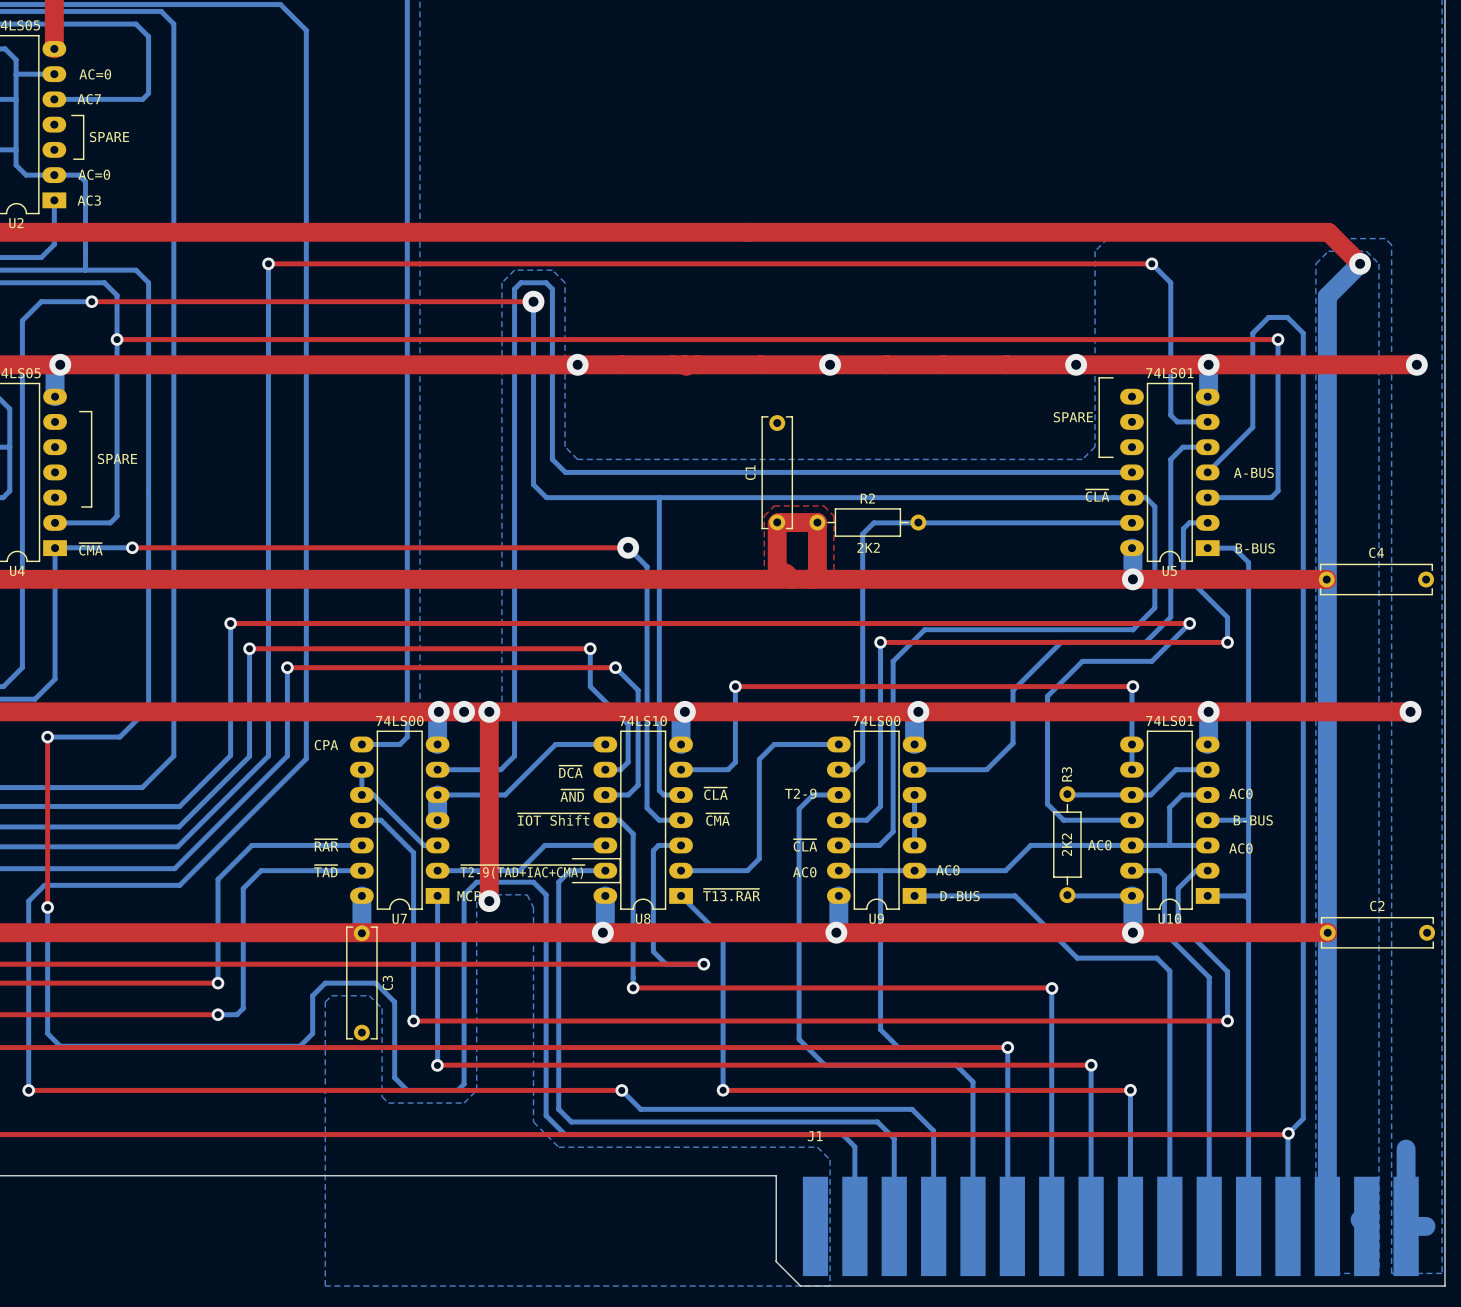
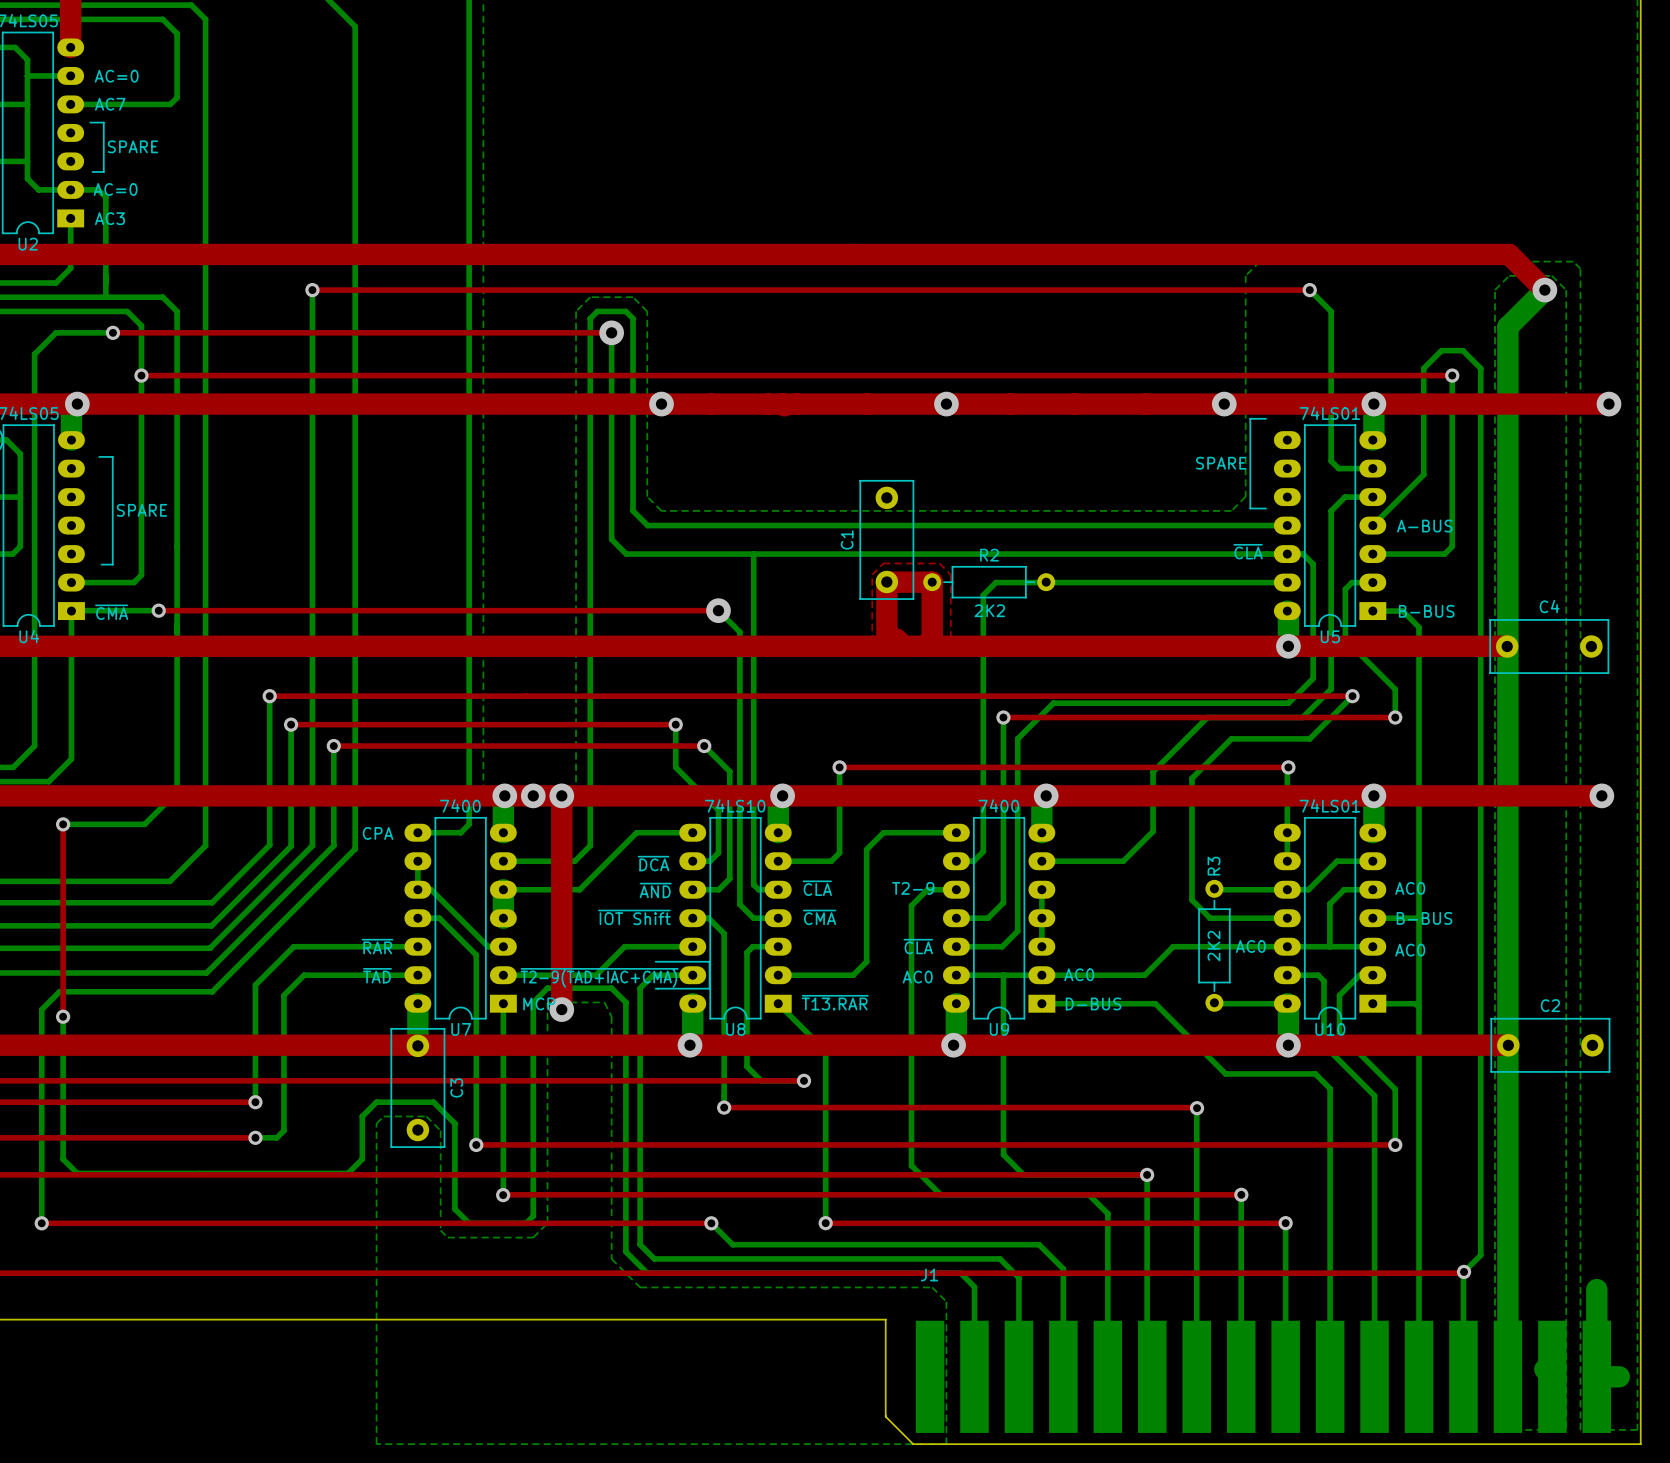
C1 footprint: [761, 415, 793, 531] -> [859, 480, 915, 600]
C4 footprint: [1318, 563, 1435, 596] -> [1489, 619, 1610, 674]
U7 value: 74LS00 (399, 720) -> 7400 (460, 805)
U9 value: 74LS00 (876, 720) -> 7400 (998, 805)
C2 footprint: [1319, 917, 1436, 949] -> [1490, 1018, 1611, 1073]
C3 footprint: [346, 925, 378, 1041] -> [390, 1028, 446, 1148]

